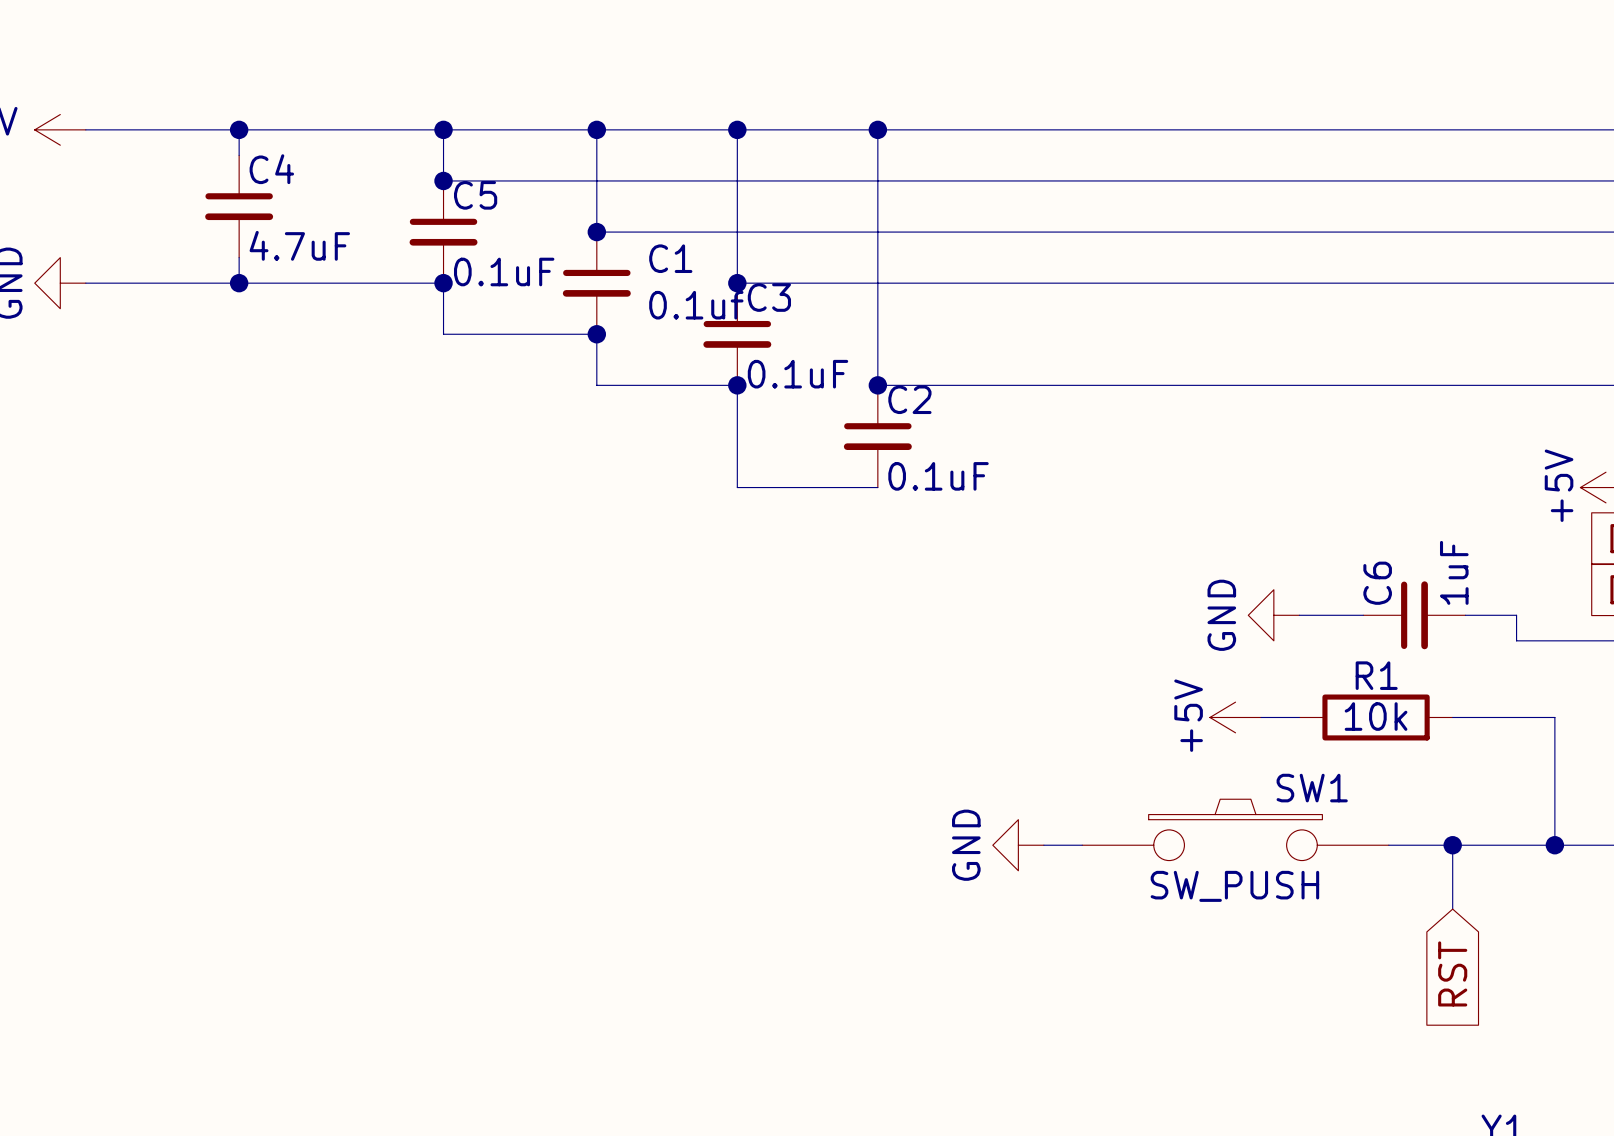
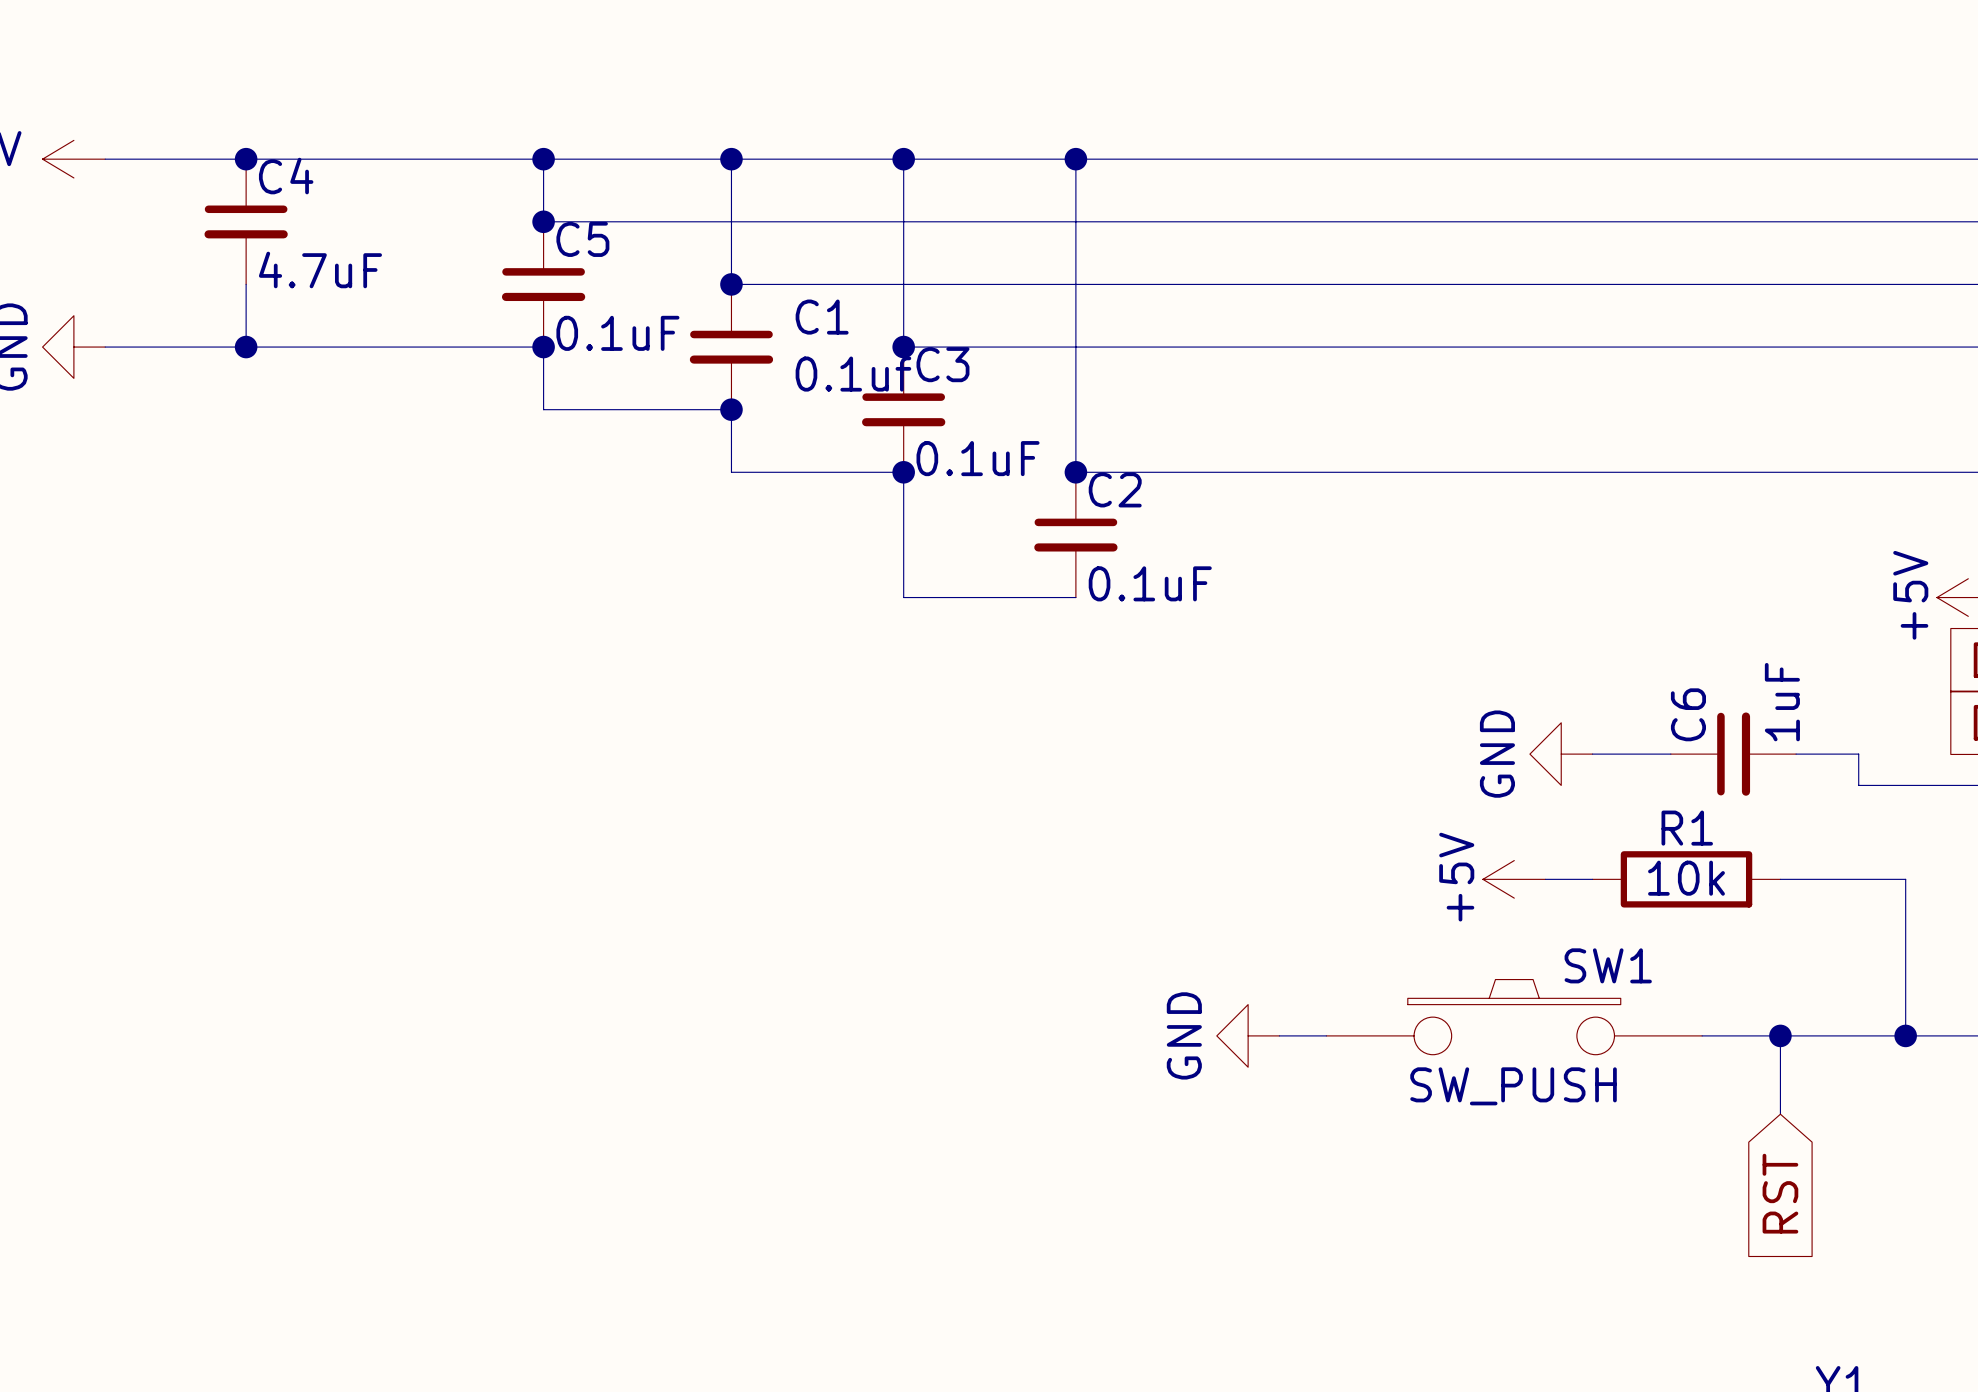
wire: (239, 129) (239, 155) -> none
junction position: (239, 129) -> (246, 159)
C4 position: (239, 206) -> (246, 221)
wire: none -> (246, 284) (246, 347)
wire: (239, 257) (239, 283) -> none
junction position: (239, 283) -> (246, 347)

